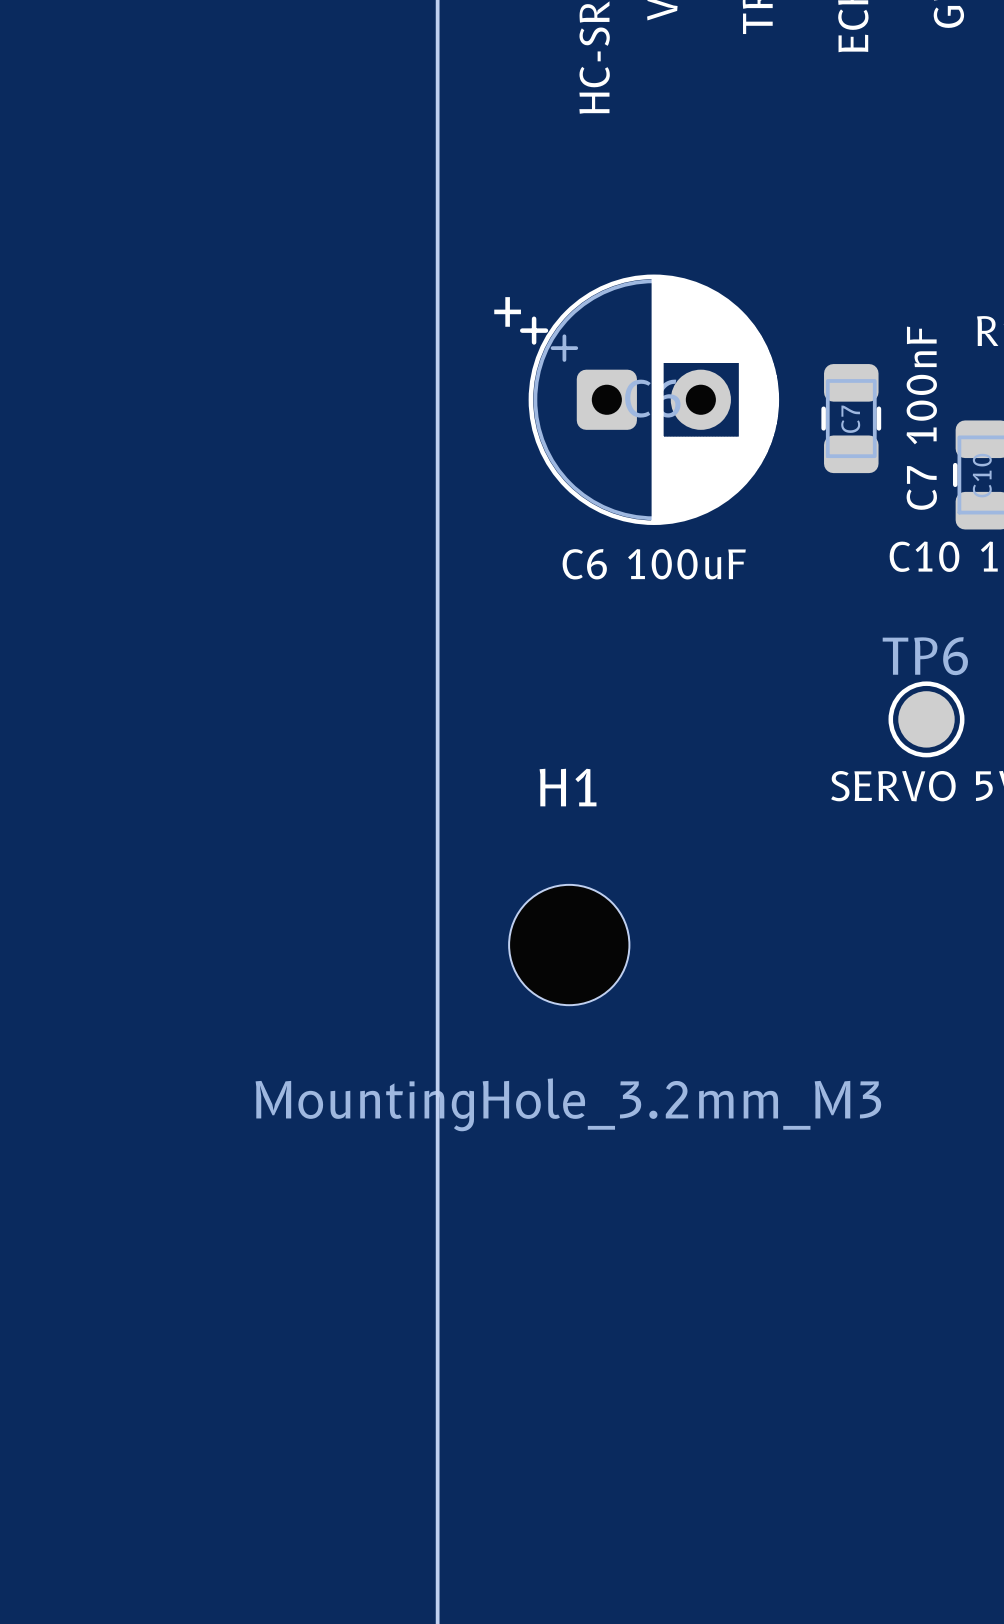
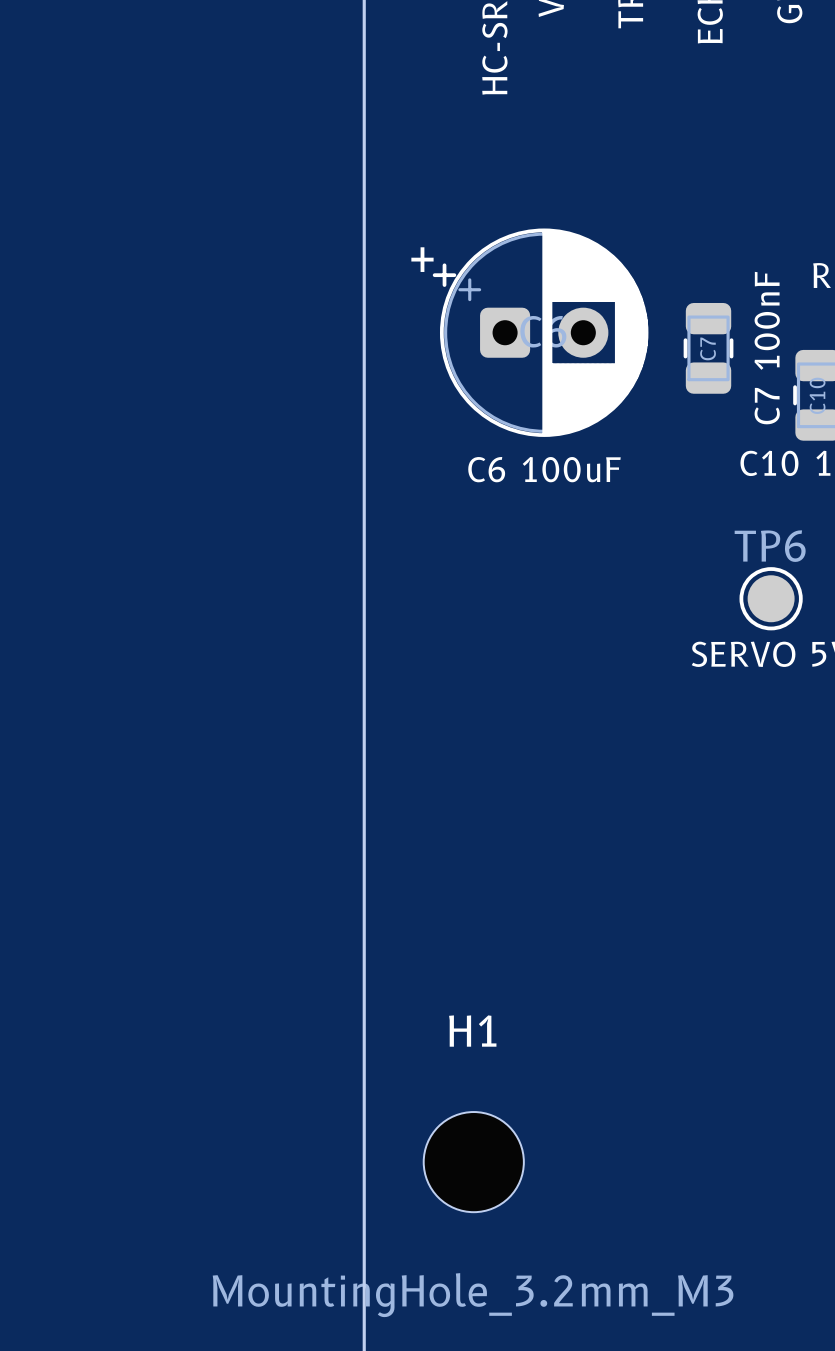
H1 position: (569, 945) -> (473, 1162)

